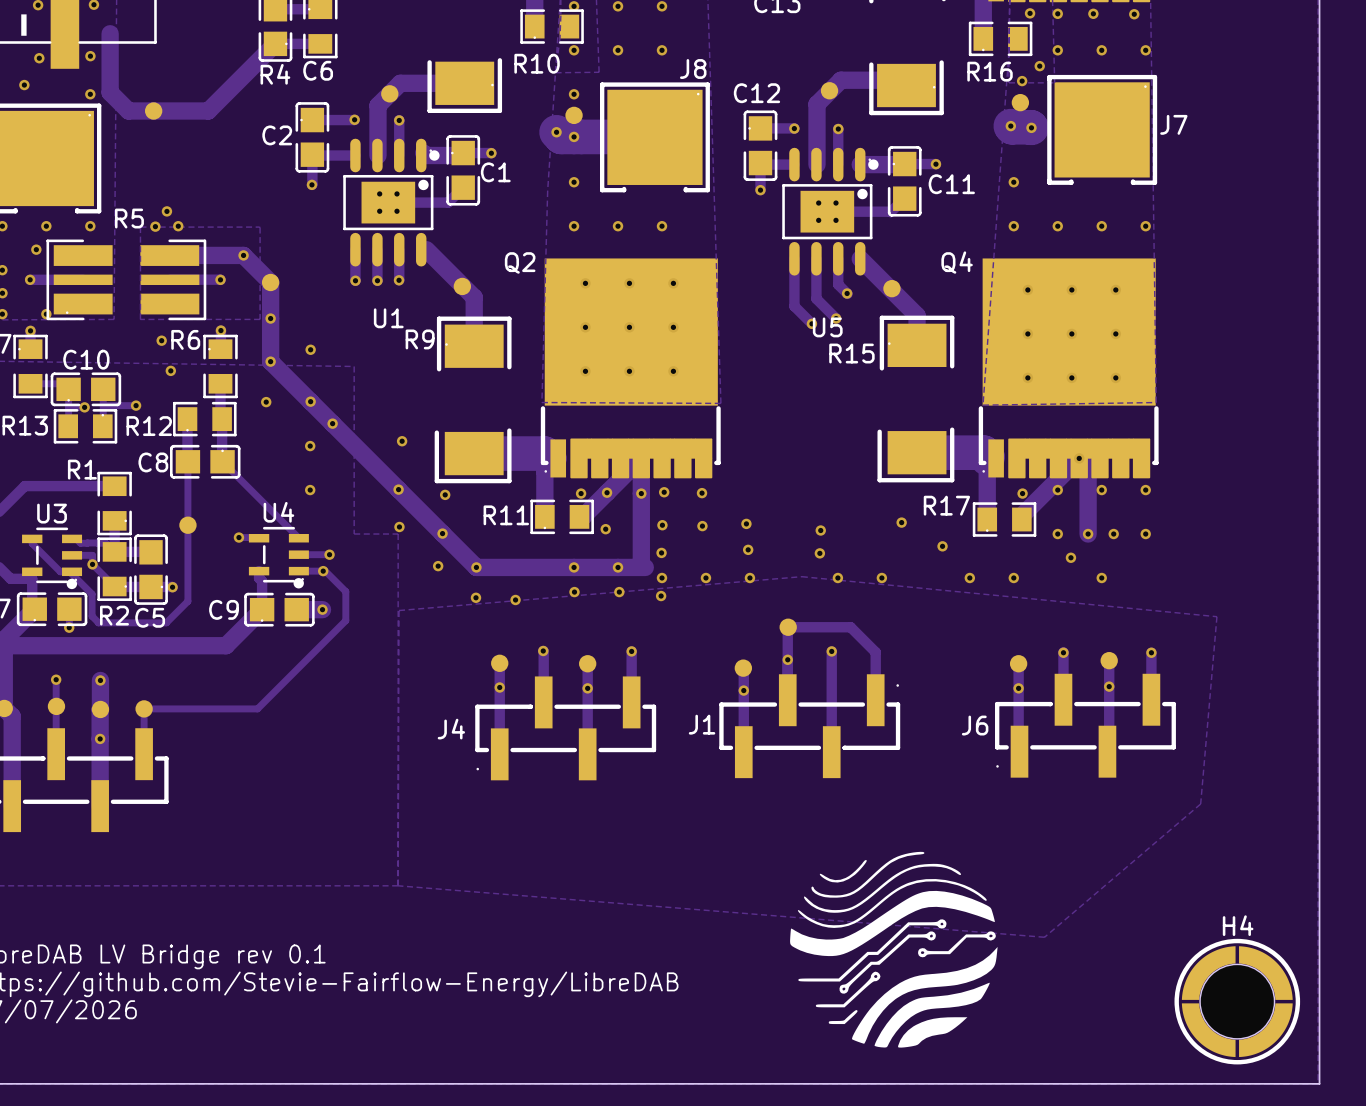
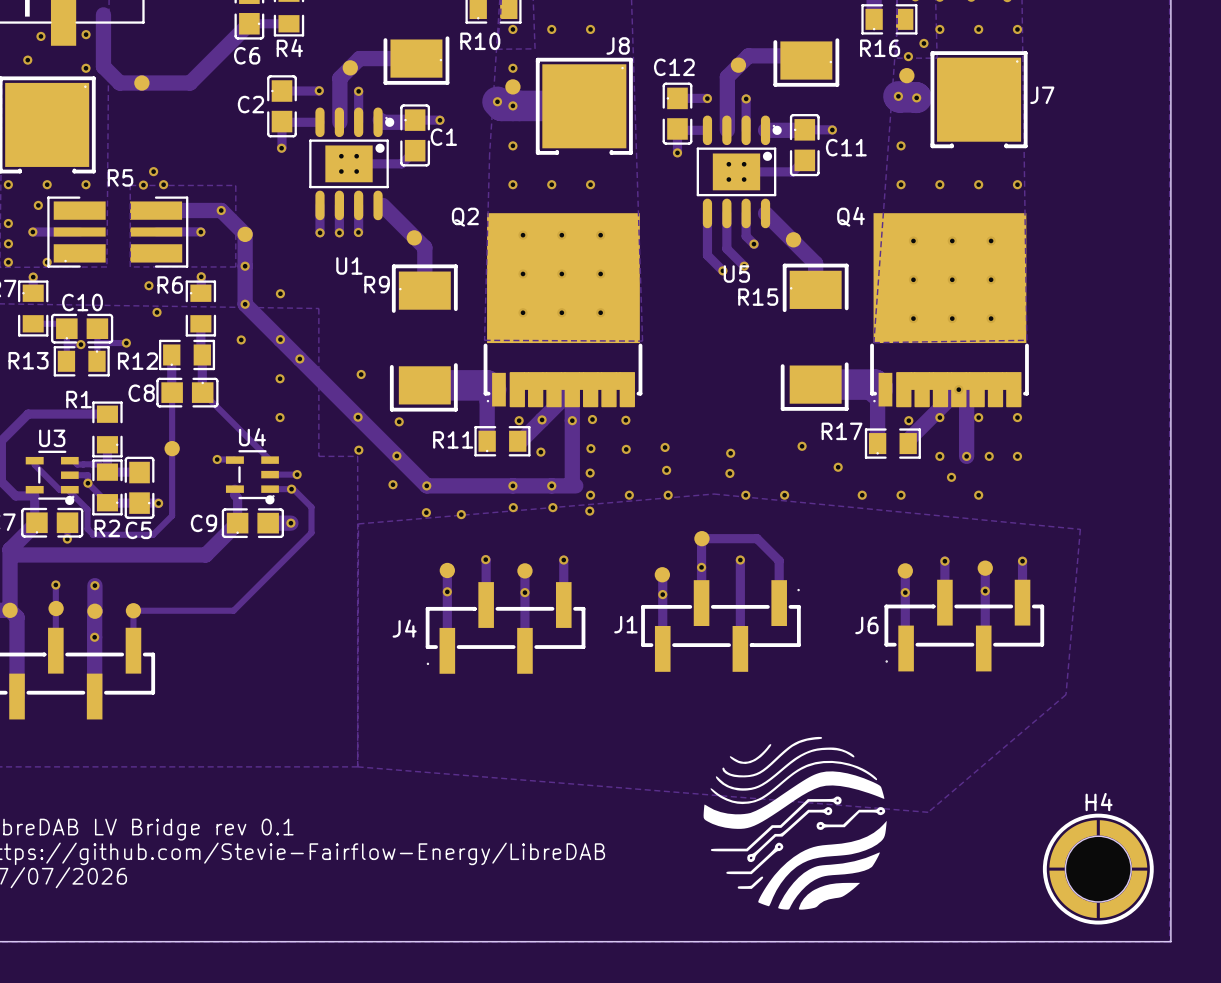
C6 name position: C6 (318, 70) -> C6 (247, 55)
R4 name position: R4 (275, 74) -> R4 (289, 48)

